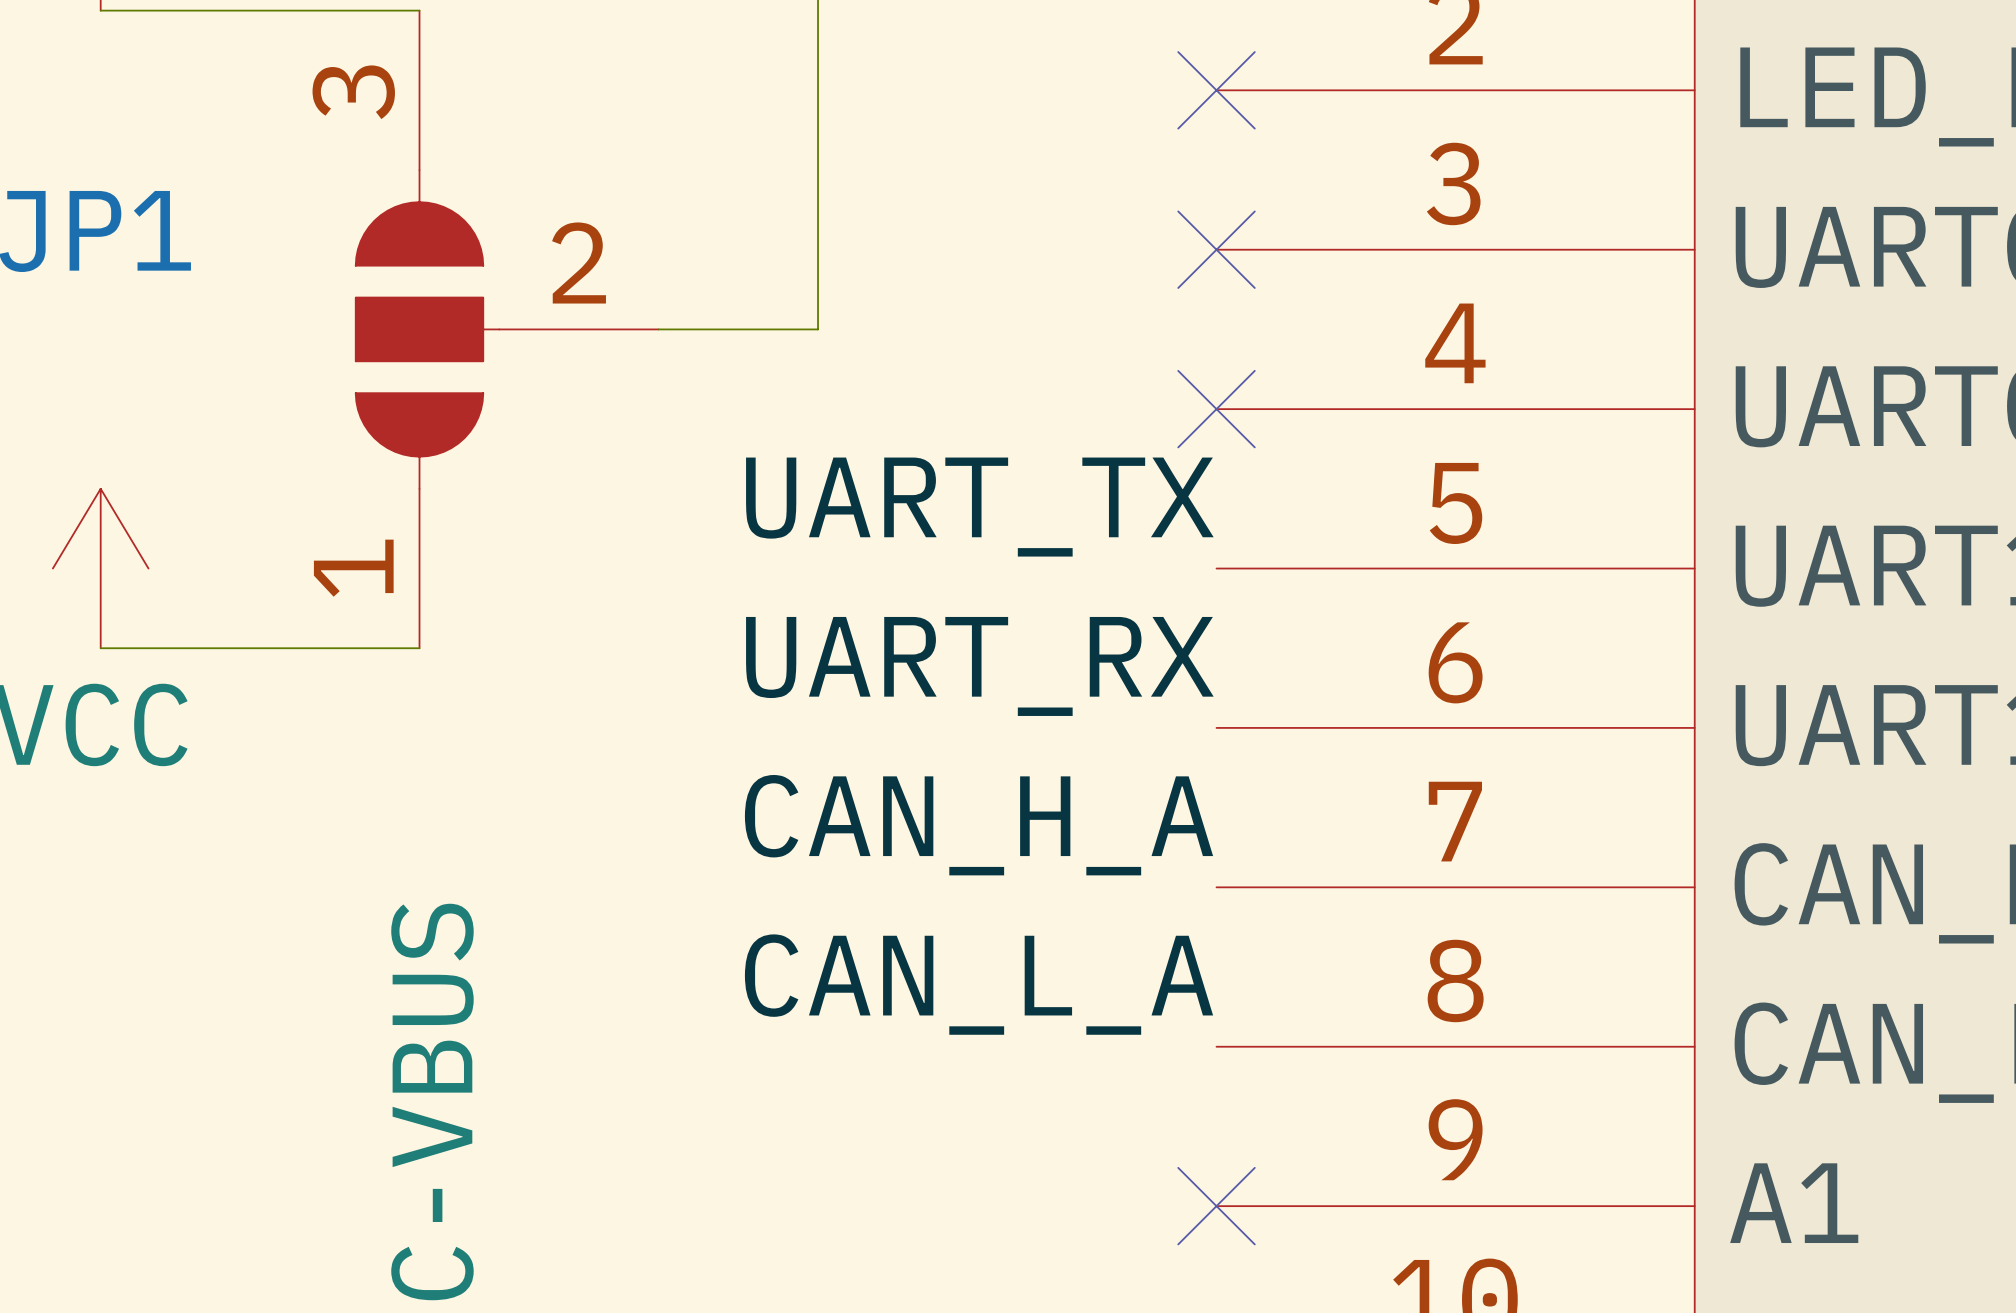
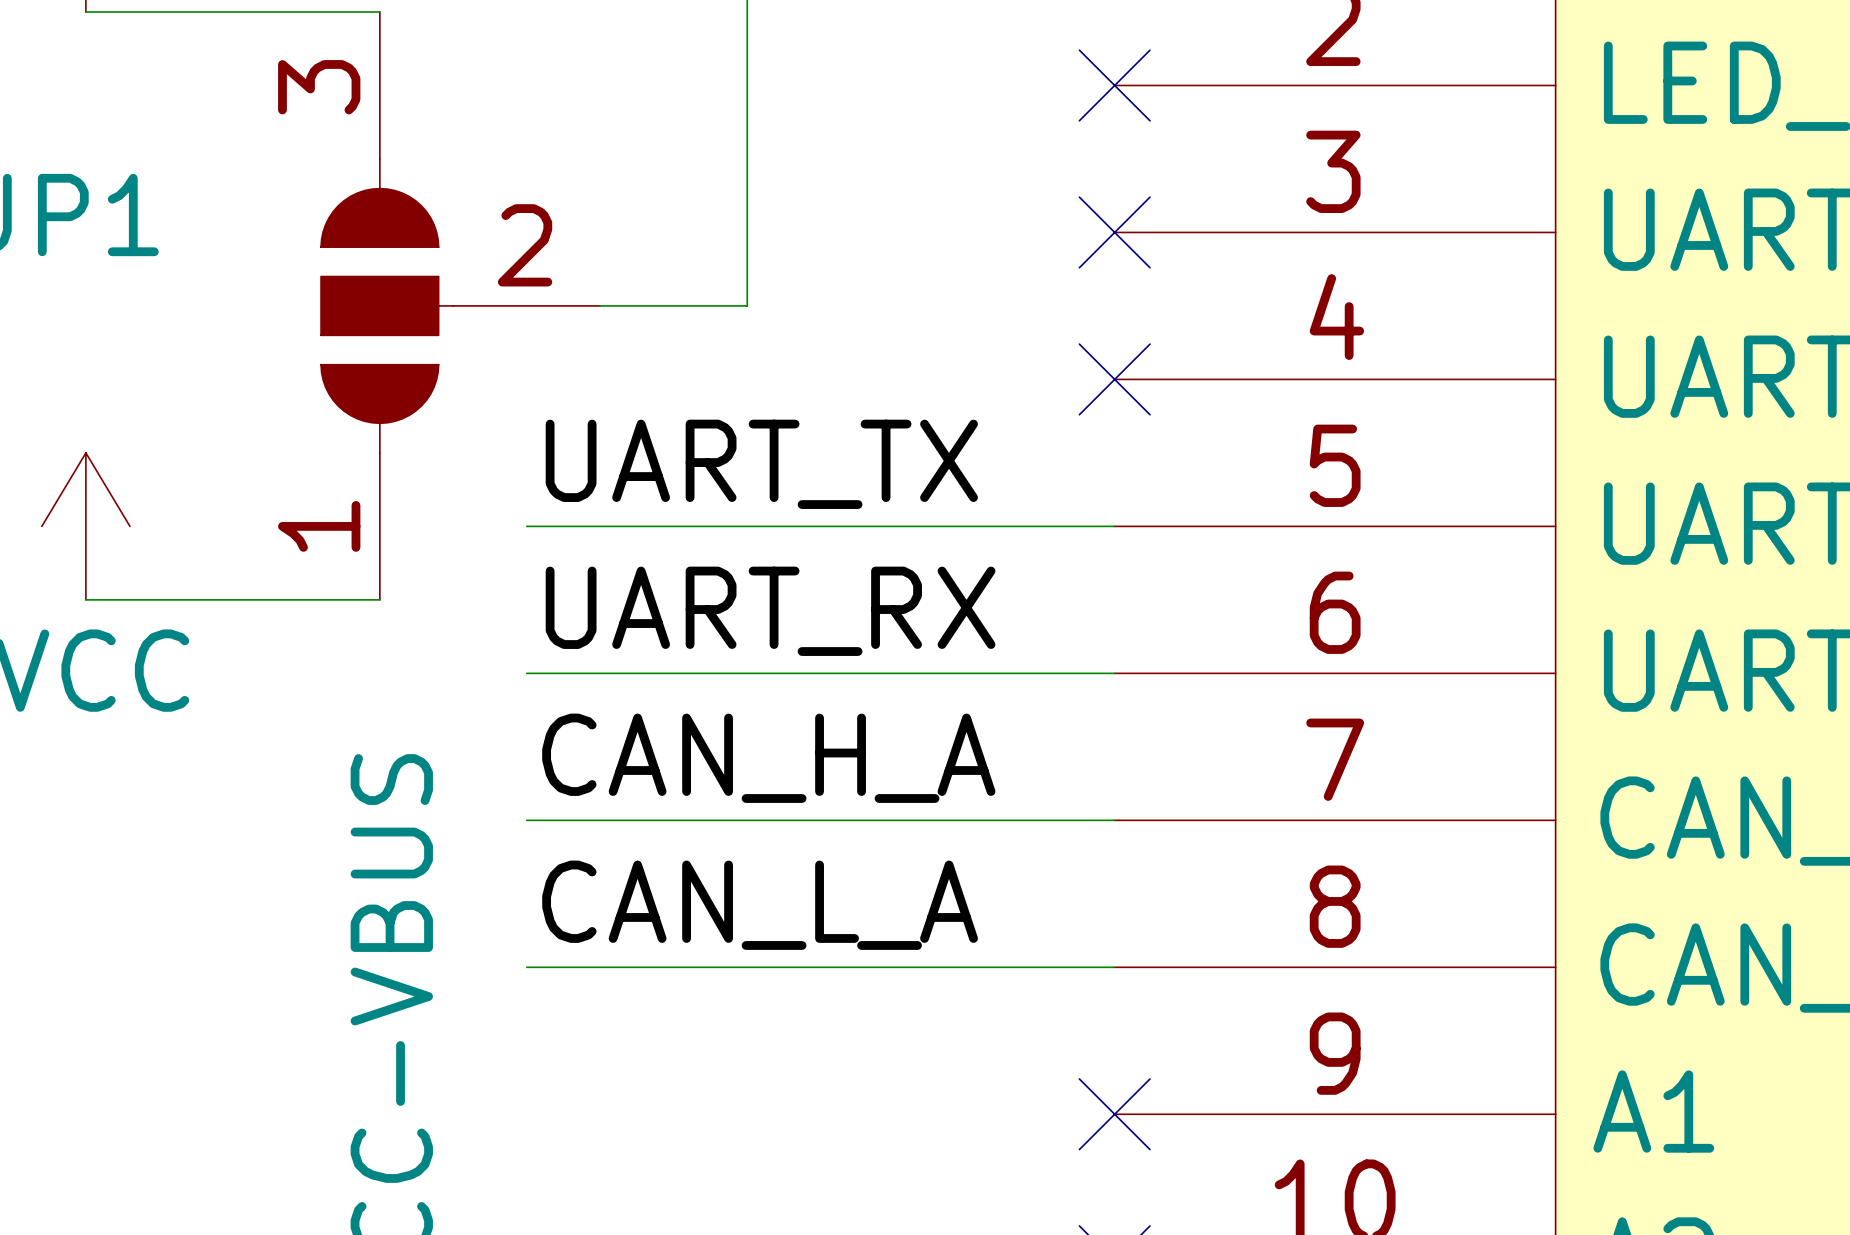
label position: UART_TX (979, 507) -> UART_TX (761, 464)
wire: none -> (526, 526) (1114, 526)
label position: UART_RX (979, 666) -> UART_RX (770, 611)
wire: none -> (526, 673) (1114, 673)
label position: CAN_H_A (979, 825) -> CAN_H_A (768, 758)
wire: none -> (526, 820) (1114, 820)
label position: CAN_L_A (979, 984) -> CAN_L_A (760, 905)
wire: none -> (526, 967) (1114, 967)

